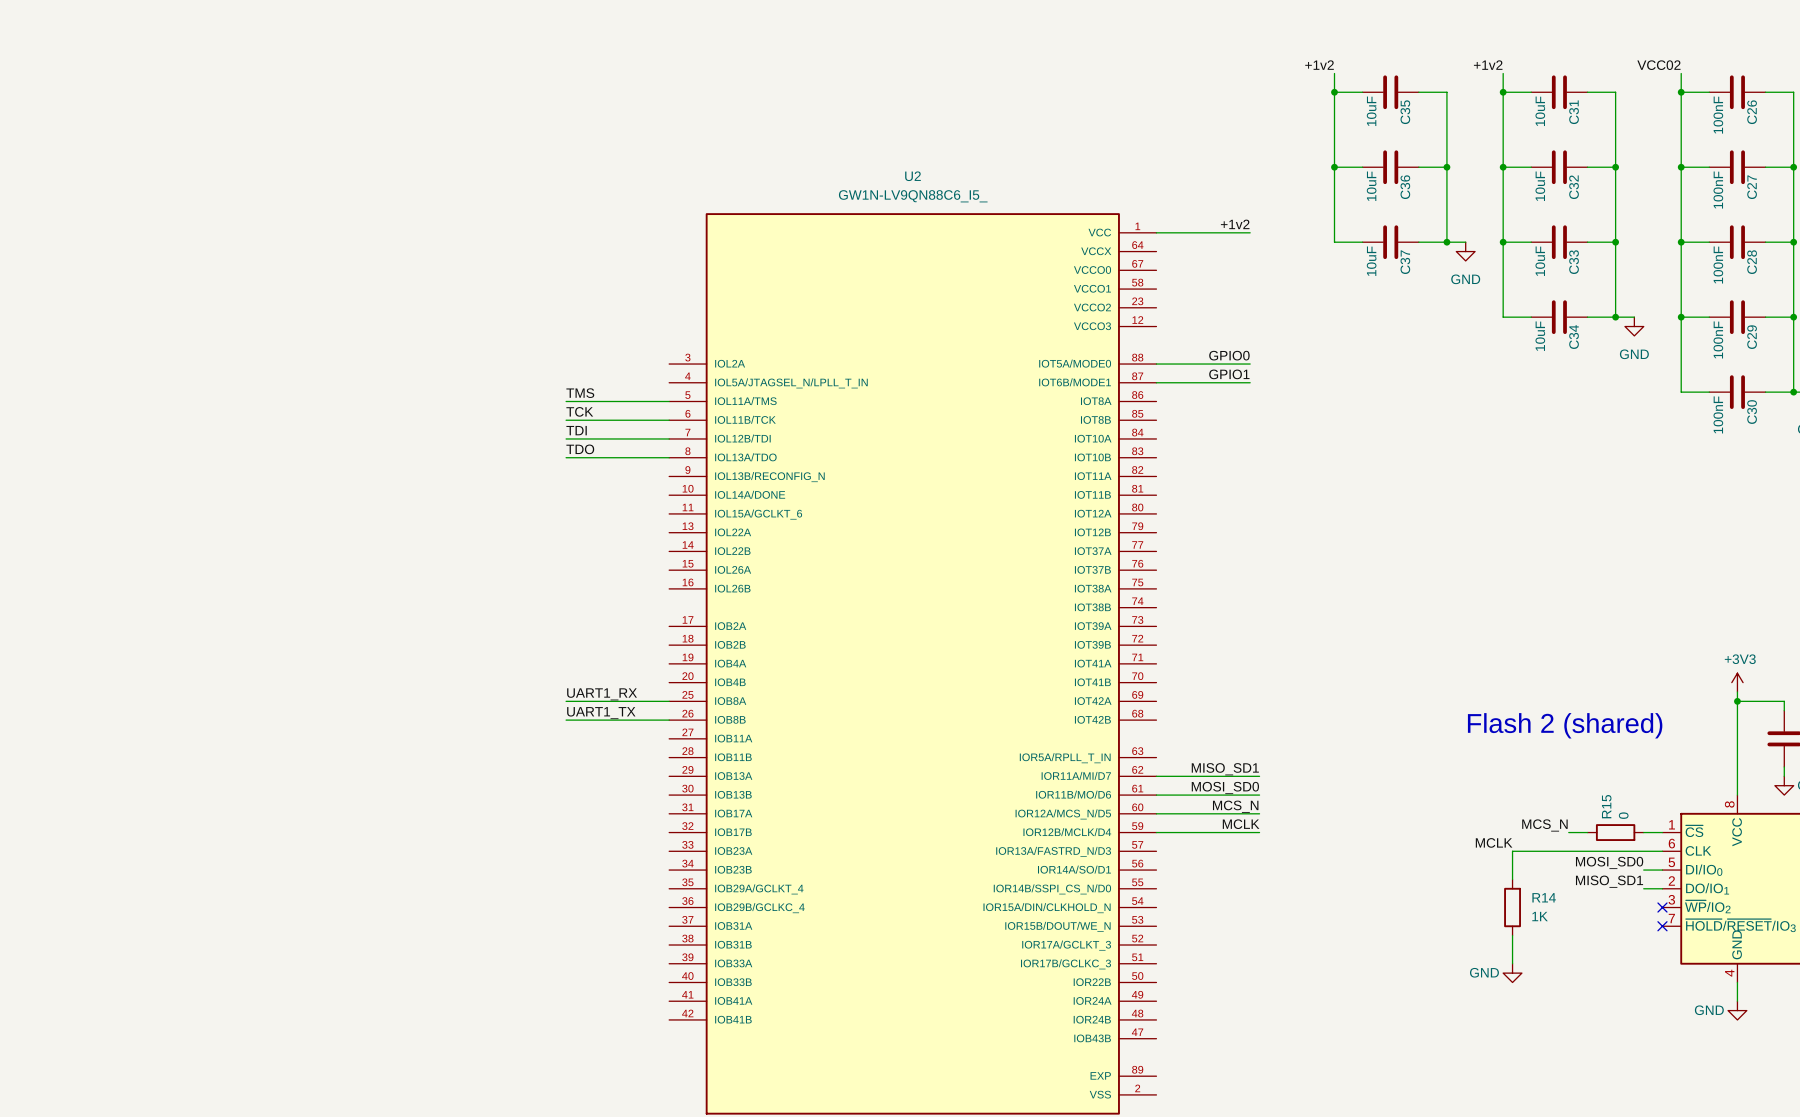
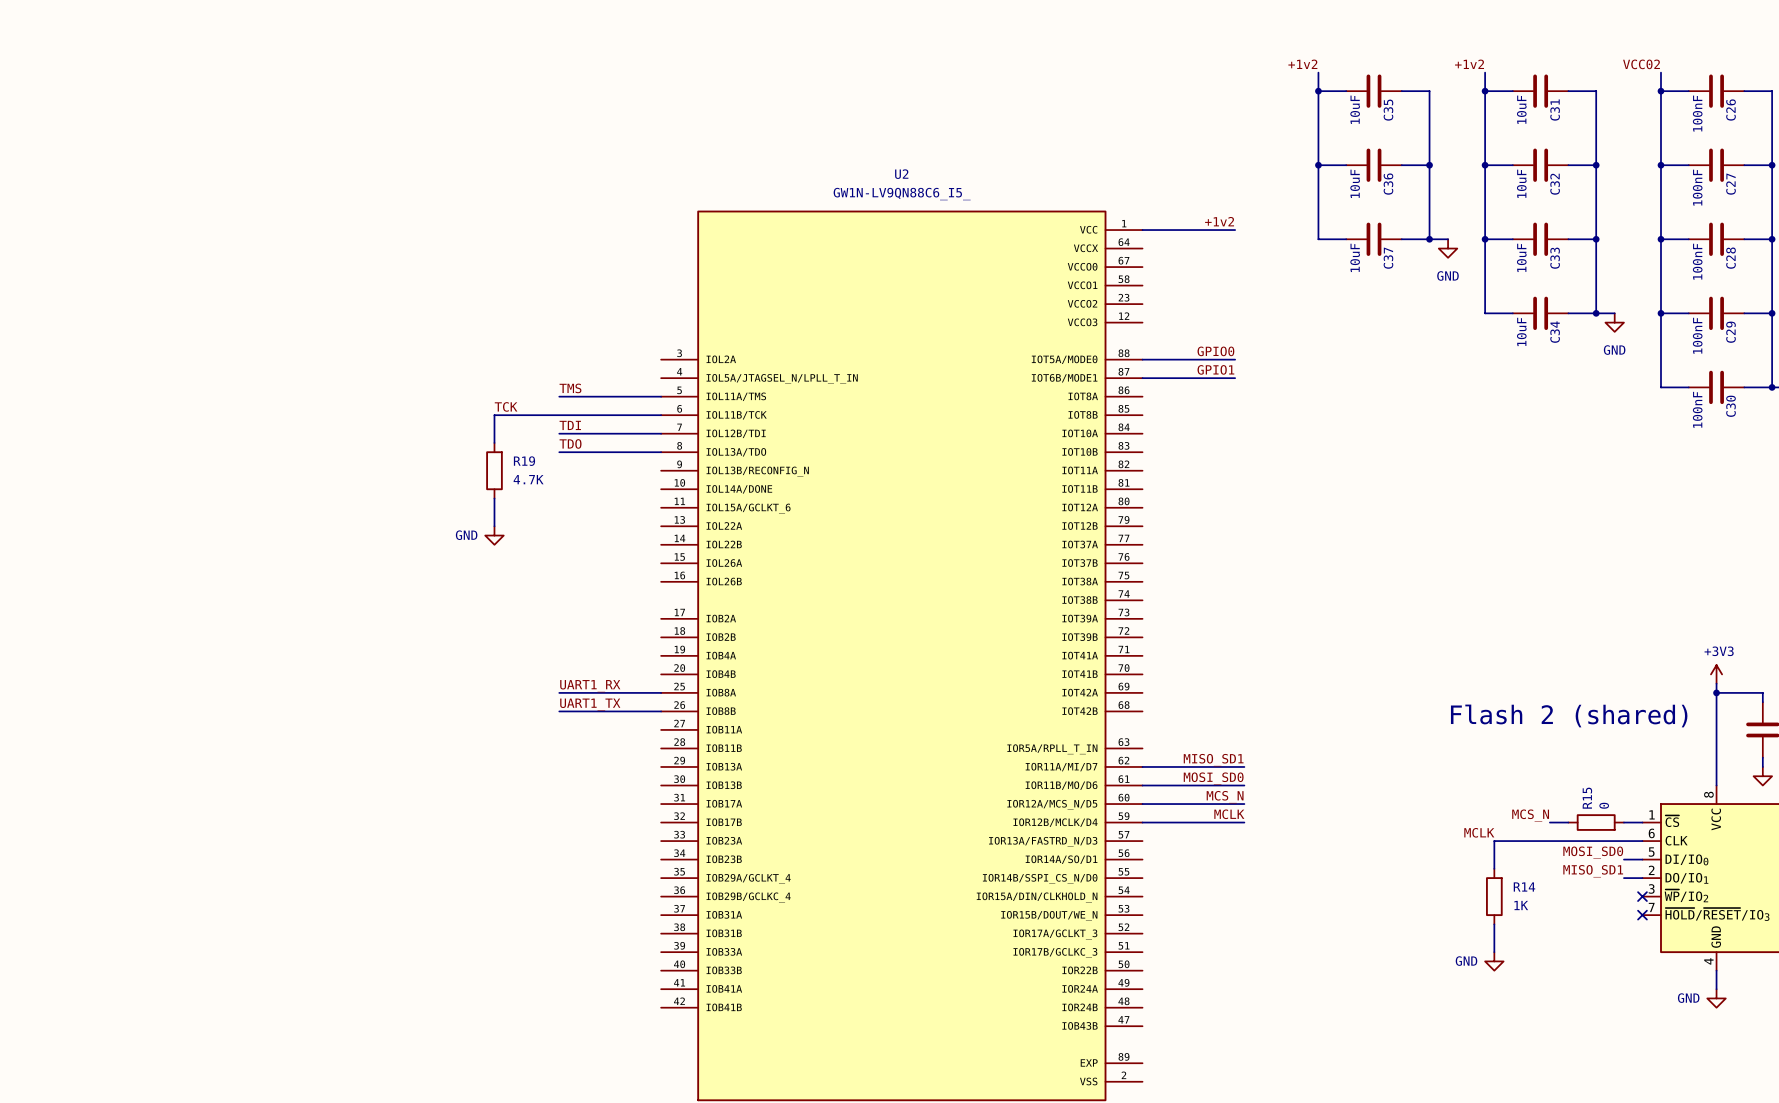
label position: TCK (579, 411) -> TCK (506, 406)
wire: none -> (559, 415) (494, 415) (494, 442)
R19: none -> 4.7K (494, 470)
wire: none -> (494, 498) (494, 526)
power symbol: none -> GND (494, 535)

